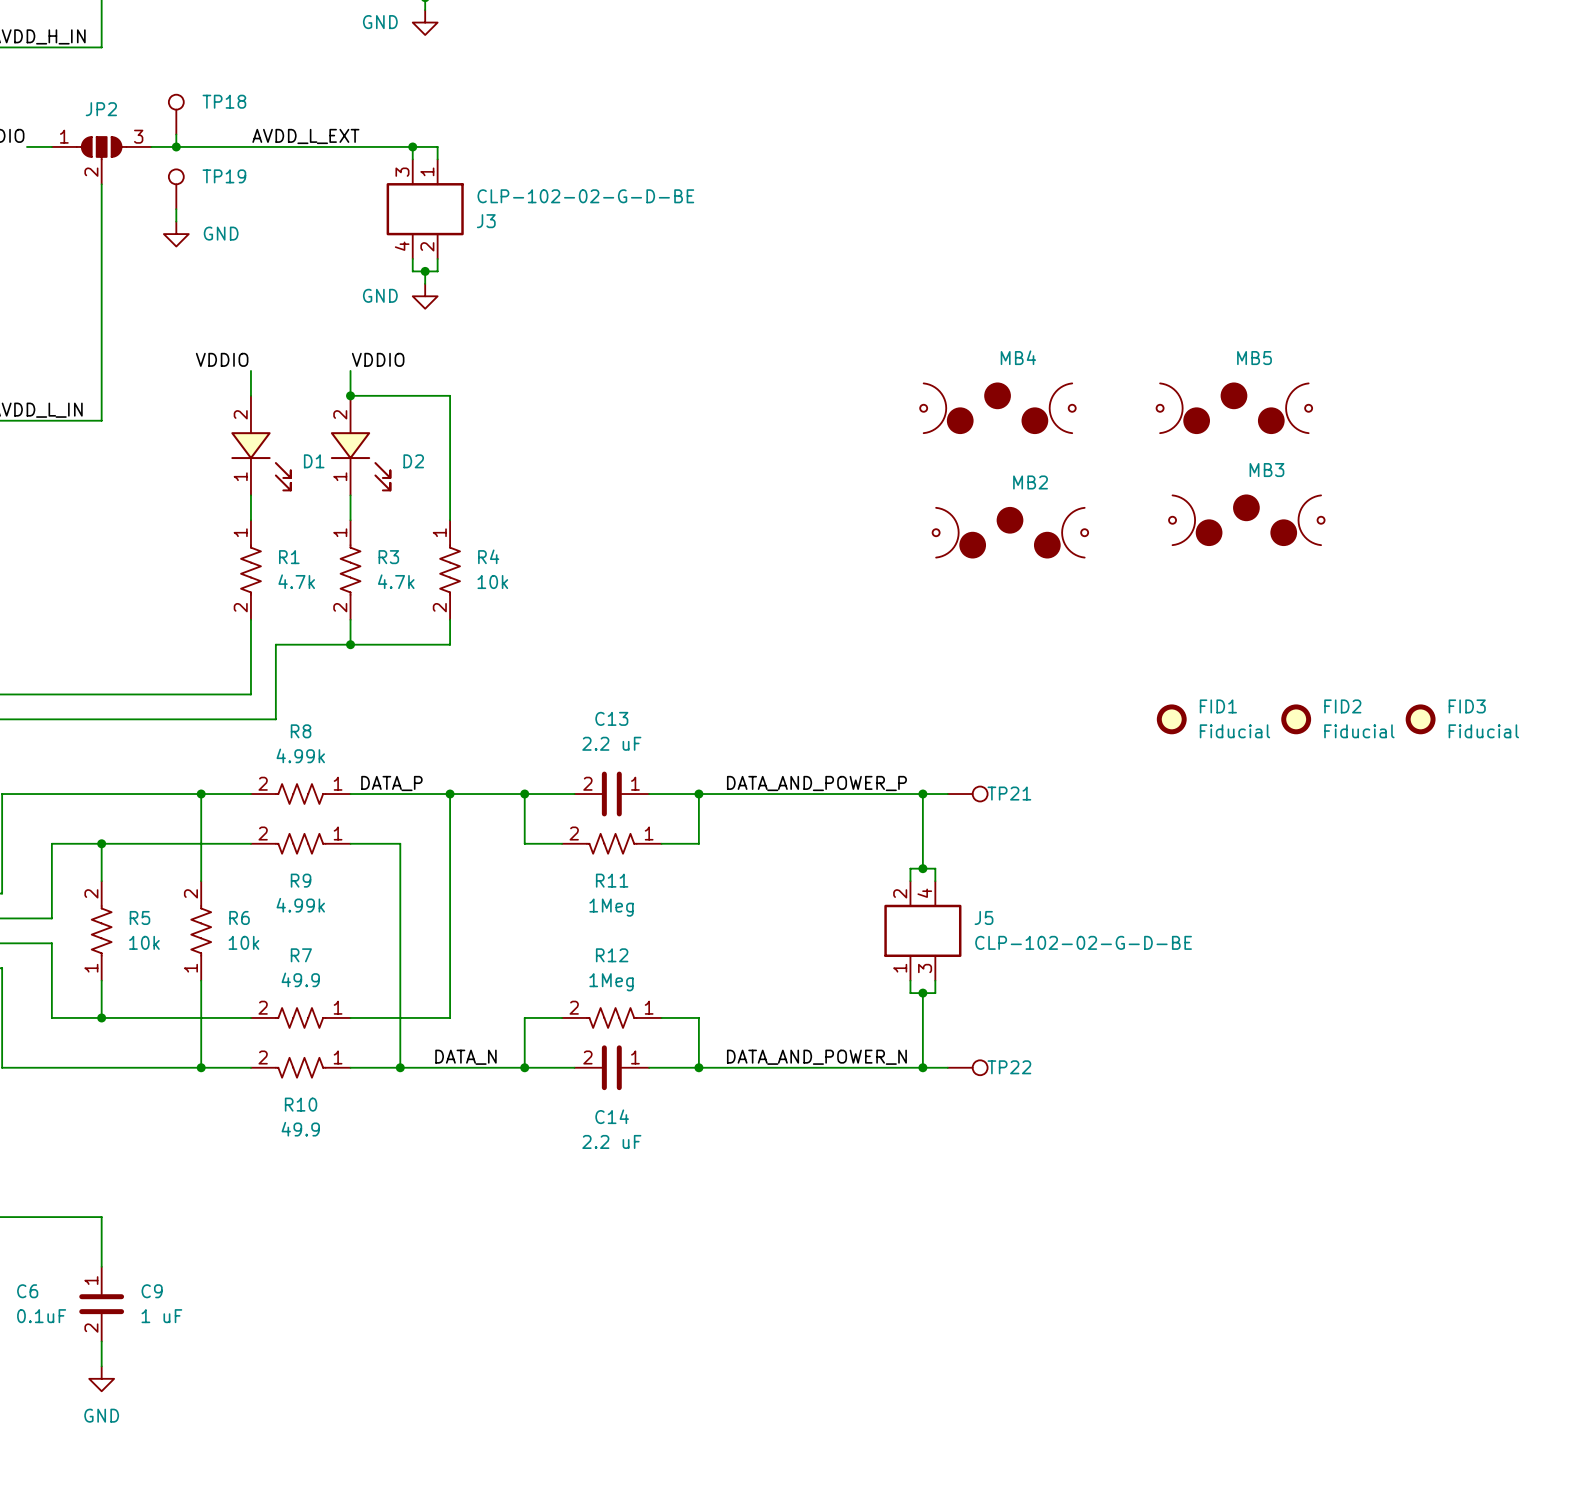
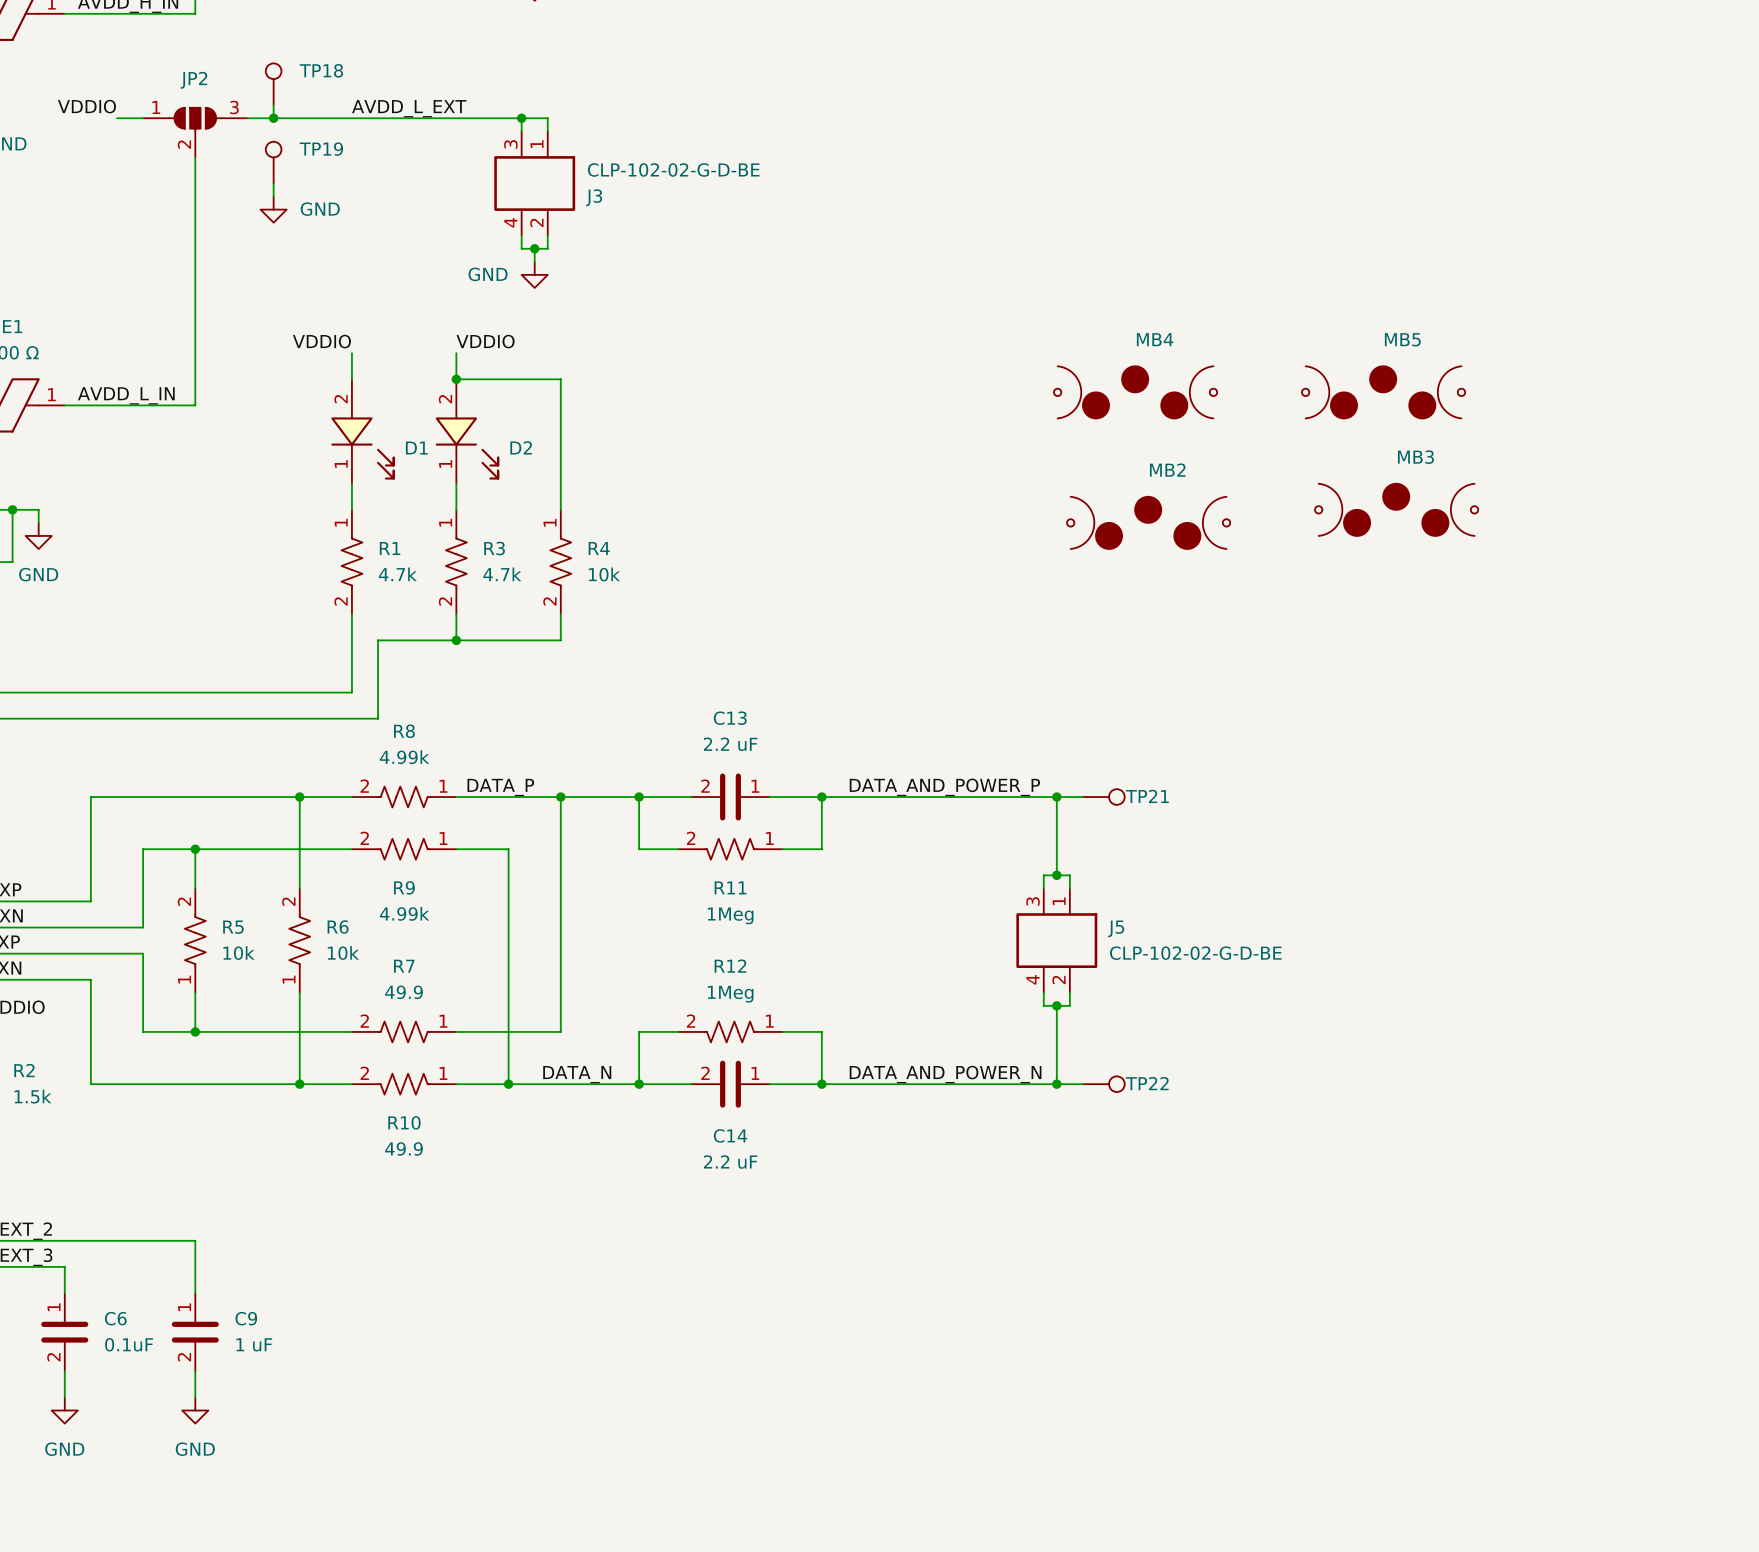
FID1: Fiducial (1171, 719) -> none
FID2: Fiducial (1296, 719) -> none
FID3: Fiducial (1420, 719) -> none
J5 rotation: 0° (922, 930) -> 180° (1056, 940)

